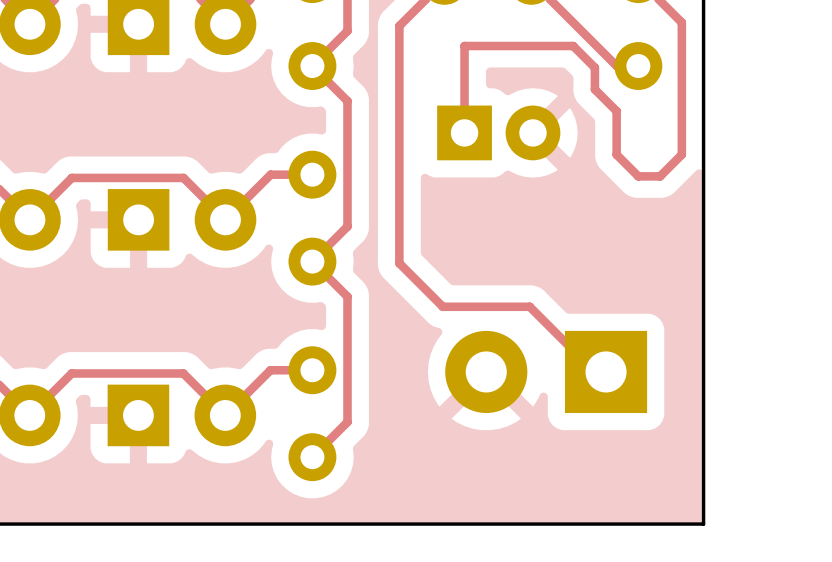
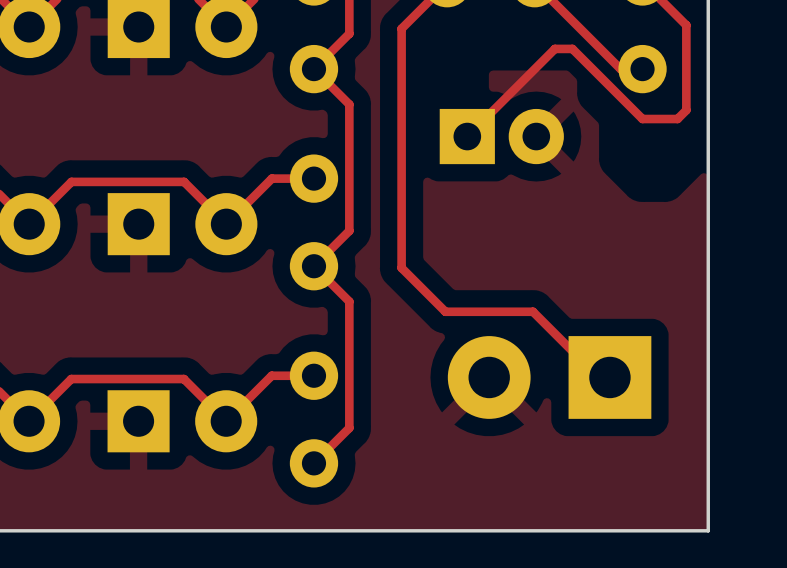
top track: (551, 46) (464, 46) (464, 132) -> (554, 48) (467, 136)
top track: (568, 46) (573, 46) (594, 67) (594, 89) (616, 111) (616, 154) (638, 176) (660, 176) (681, 154) (681, 106) -> (572, 48) (642, 119) (677, 119) (686, 110)

